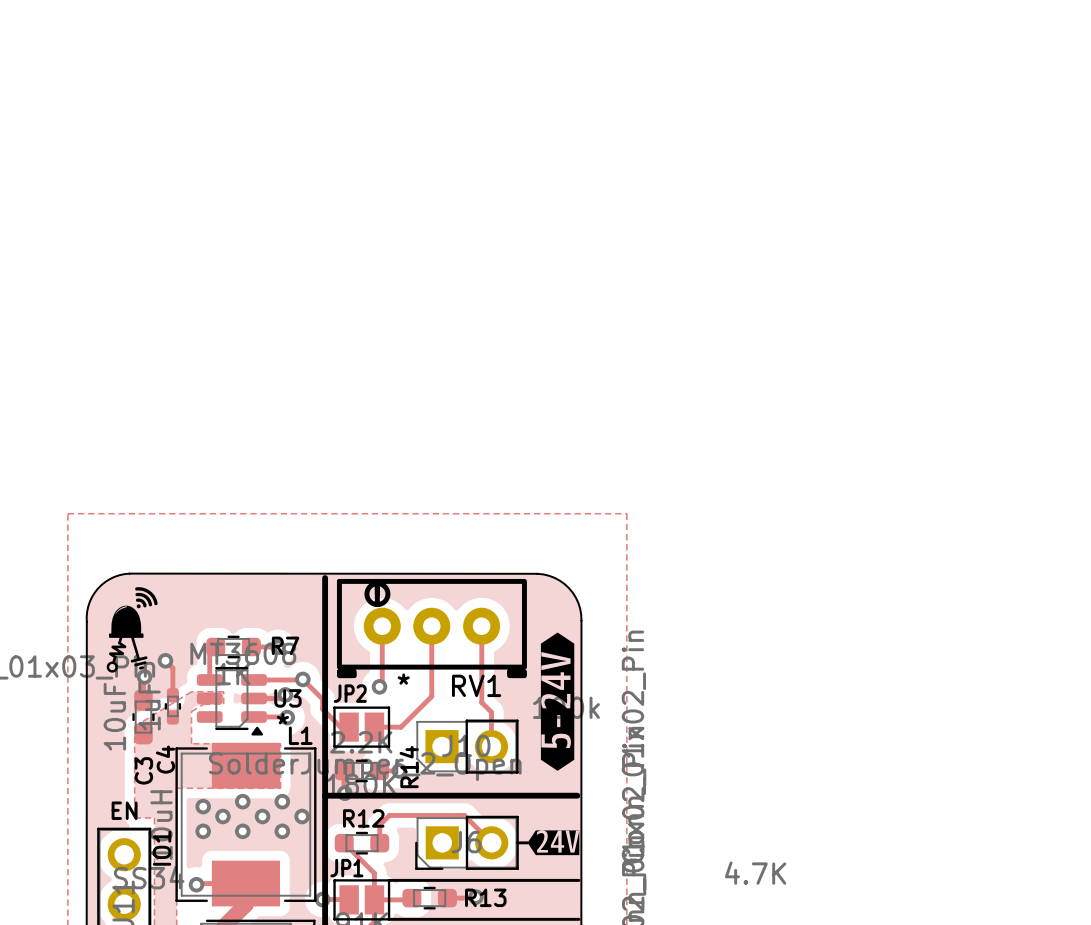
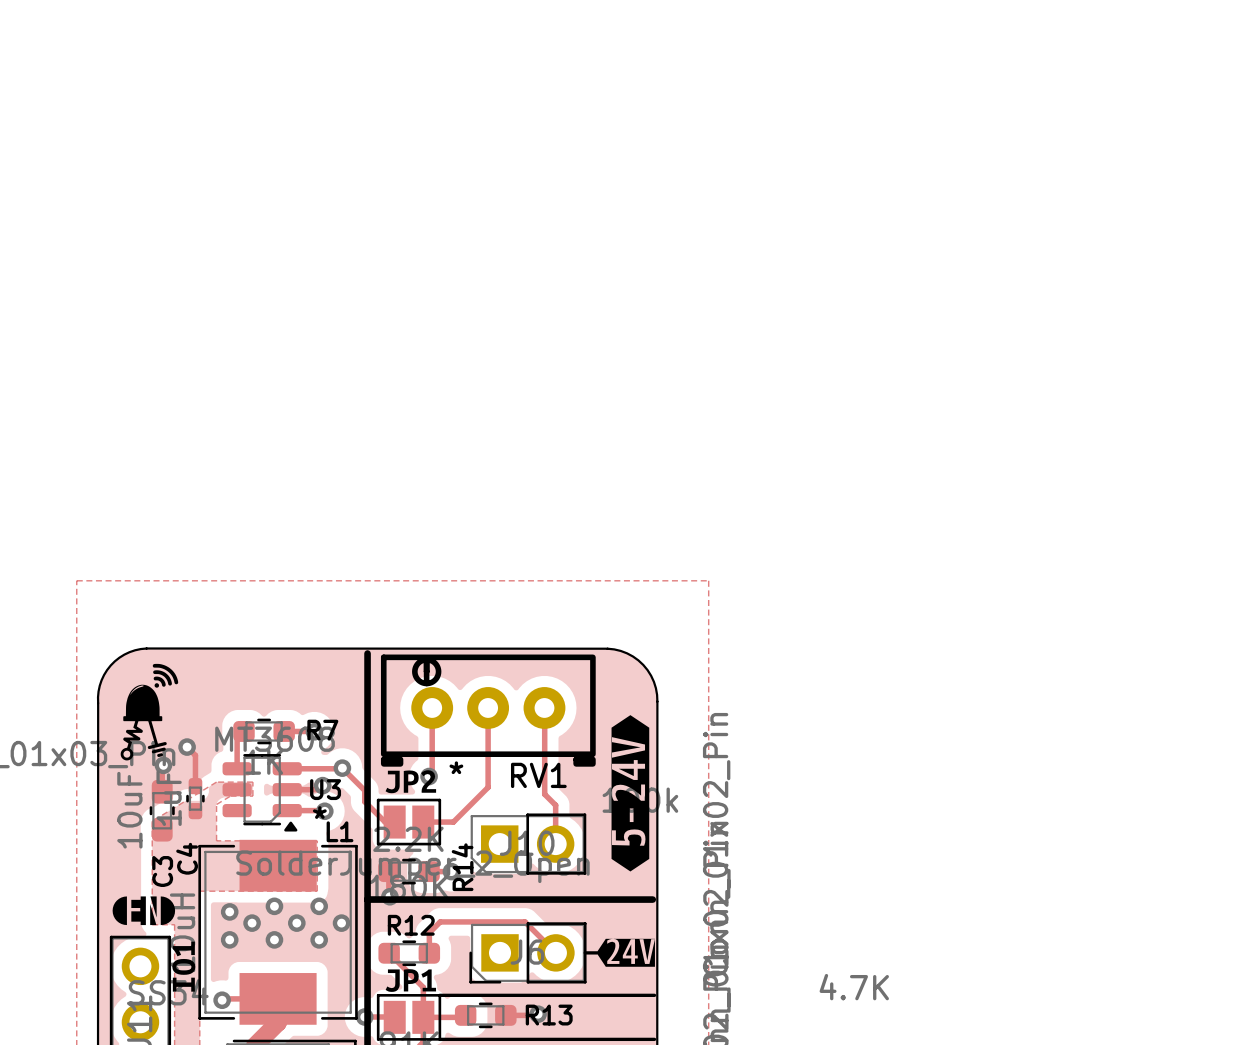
drawing: none -> [385, 770, 437, 794]
JP2 name: JP2 (350, 693) -> none
drawing: none -> [112, 896, 196, 992]
text: EN (124, 810) -> none
text: IO1 (162, 848) -> none
drawing: none -> [385, 969, 437, 992]
JP1 name: JP1 (346, 868) -> none

